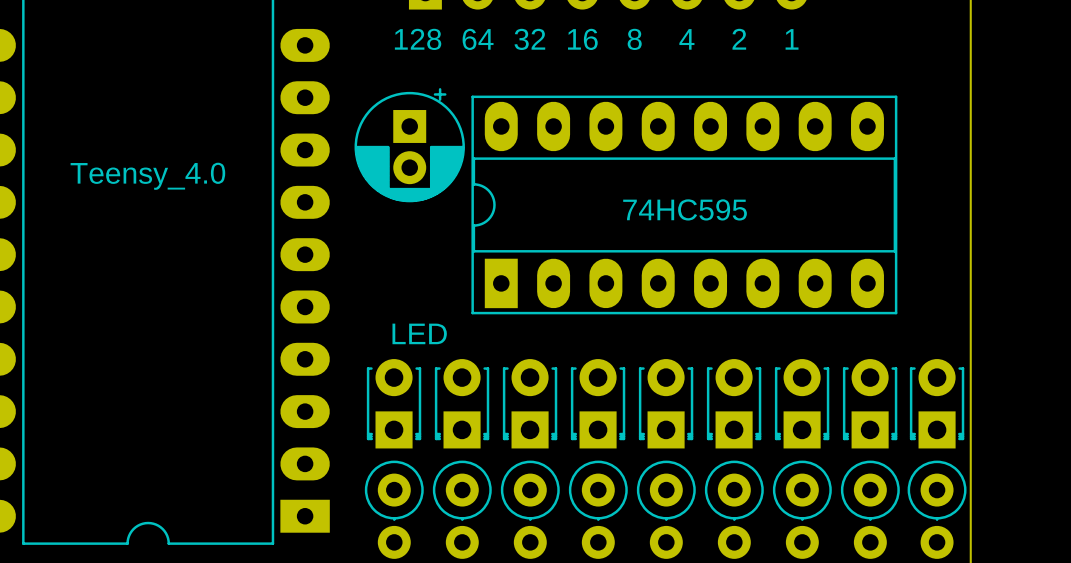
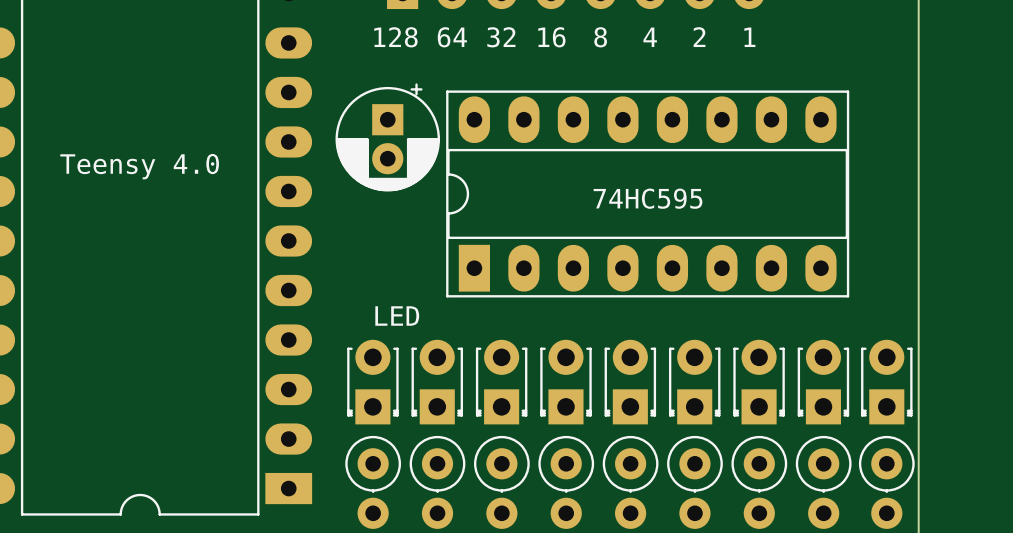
part value: Teensy_4.0 (147, 176) -> Teensy 4.0 (139, 166)

